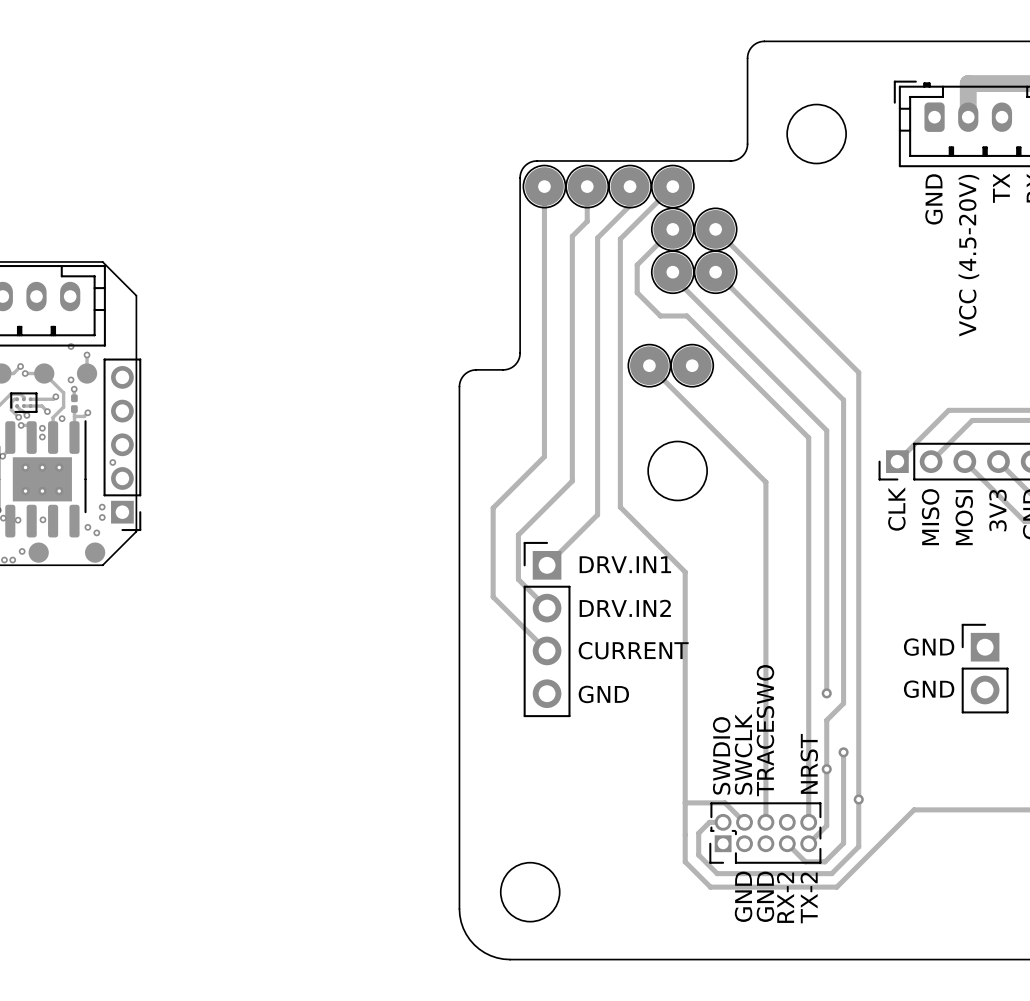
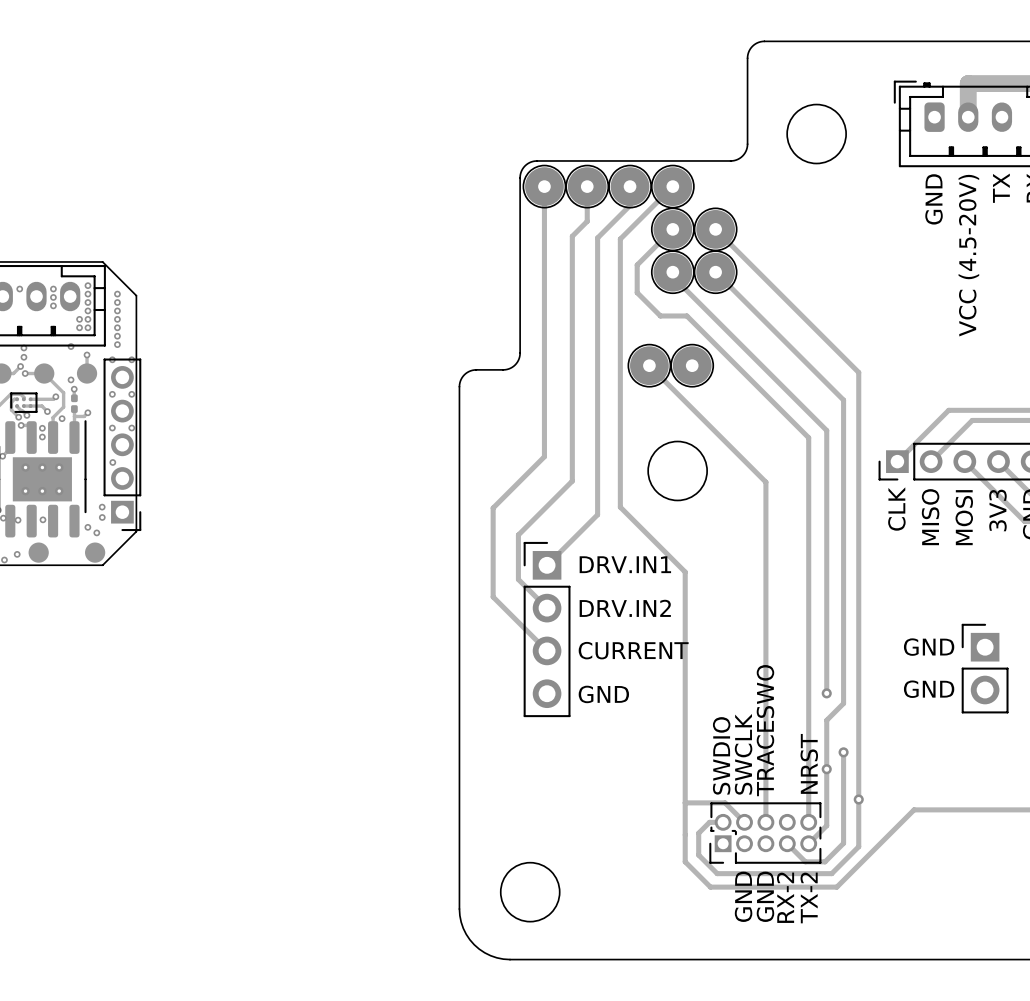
via: none -> (87, 285)
via: none -> (19, 289)
via: none -> (53, 289)
via: none -> (87, 294)
via: none -> (117, 294)
via: none -> (53, 297)
via: none -> (87, 302)
via: none -> (117, 302)
via: none -> (53, 305)
via: none -> (87, 310)
via: none -> (117, 310)
via: none -> (79, 319)
via: none -> (87, 319)
via: none -> (117, 319)
via: none -> (79, 327)
via: none -> (87, 327)
via: none -> (117, 327)
via: none -> (117, 336)
via: none -> (117, 344)
via: none -> (23, 347)
via: none -> (23, 357)
via: none -> (112, 359)
via: none -> (131, 359)
via: none -> (112, 394)
via: none -> (131, 394)
via: none -> (112, 428)
via: none -> (131, 428)
via: (22, 551) -> none
via: none -> (17, 554)
via: (12, 560) -> none

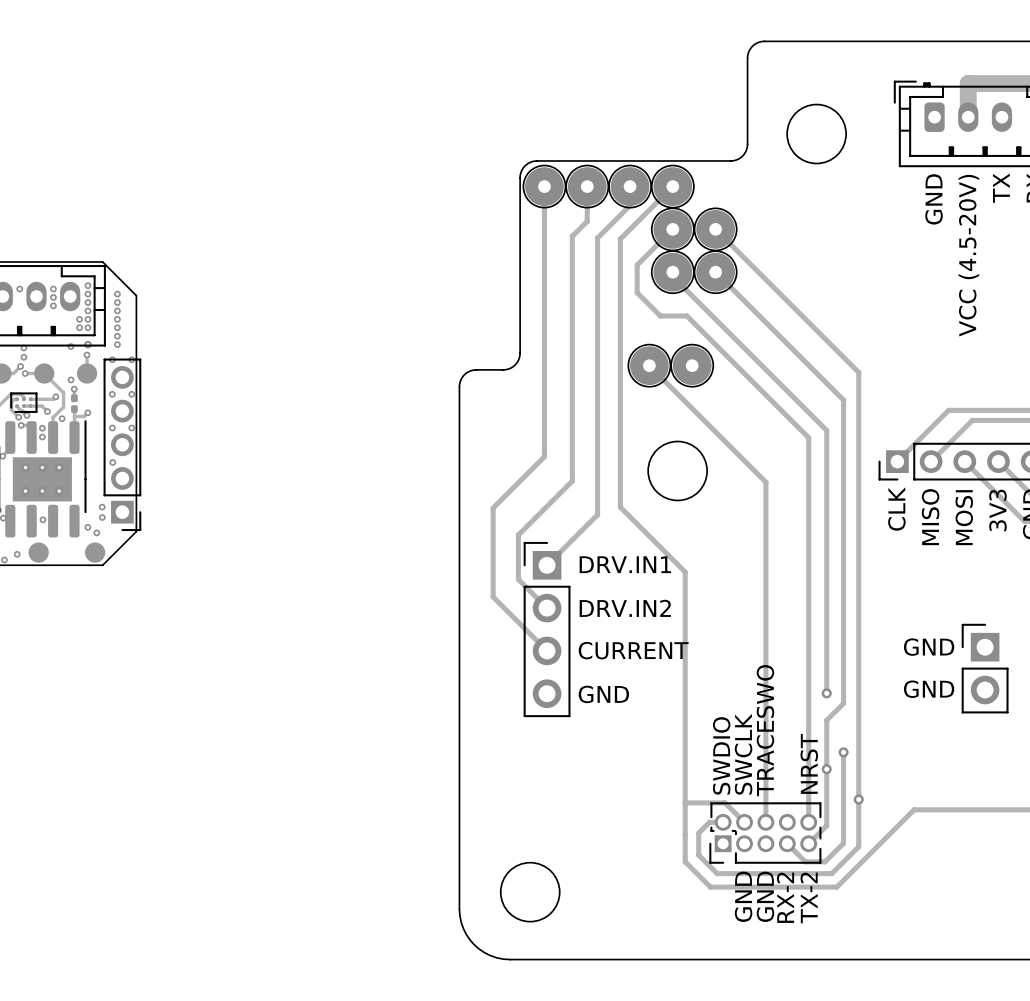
via: none -> (87, 344)
via: (18, 520) -> none

